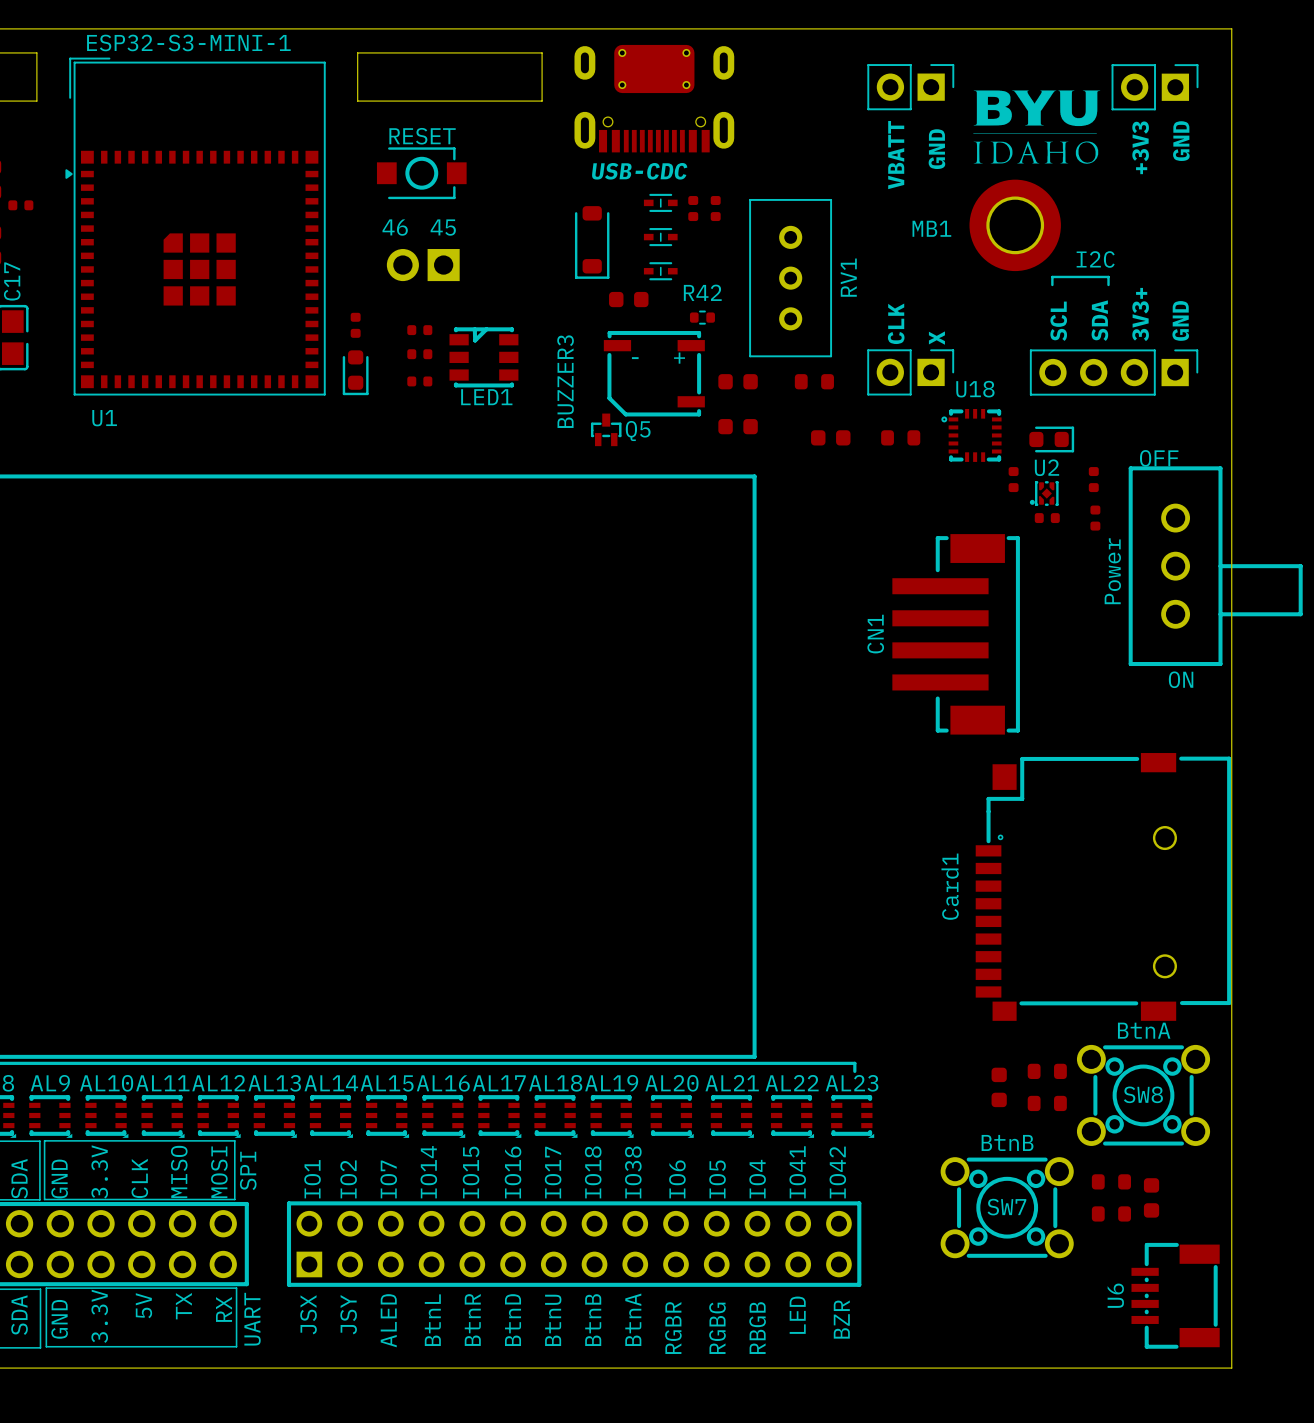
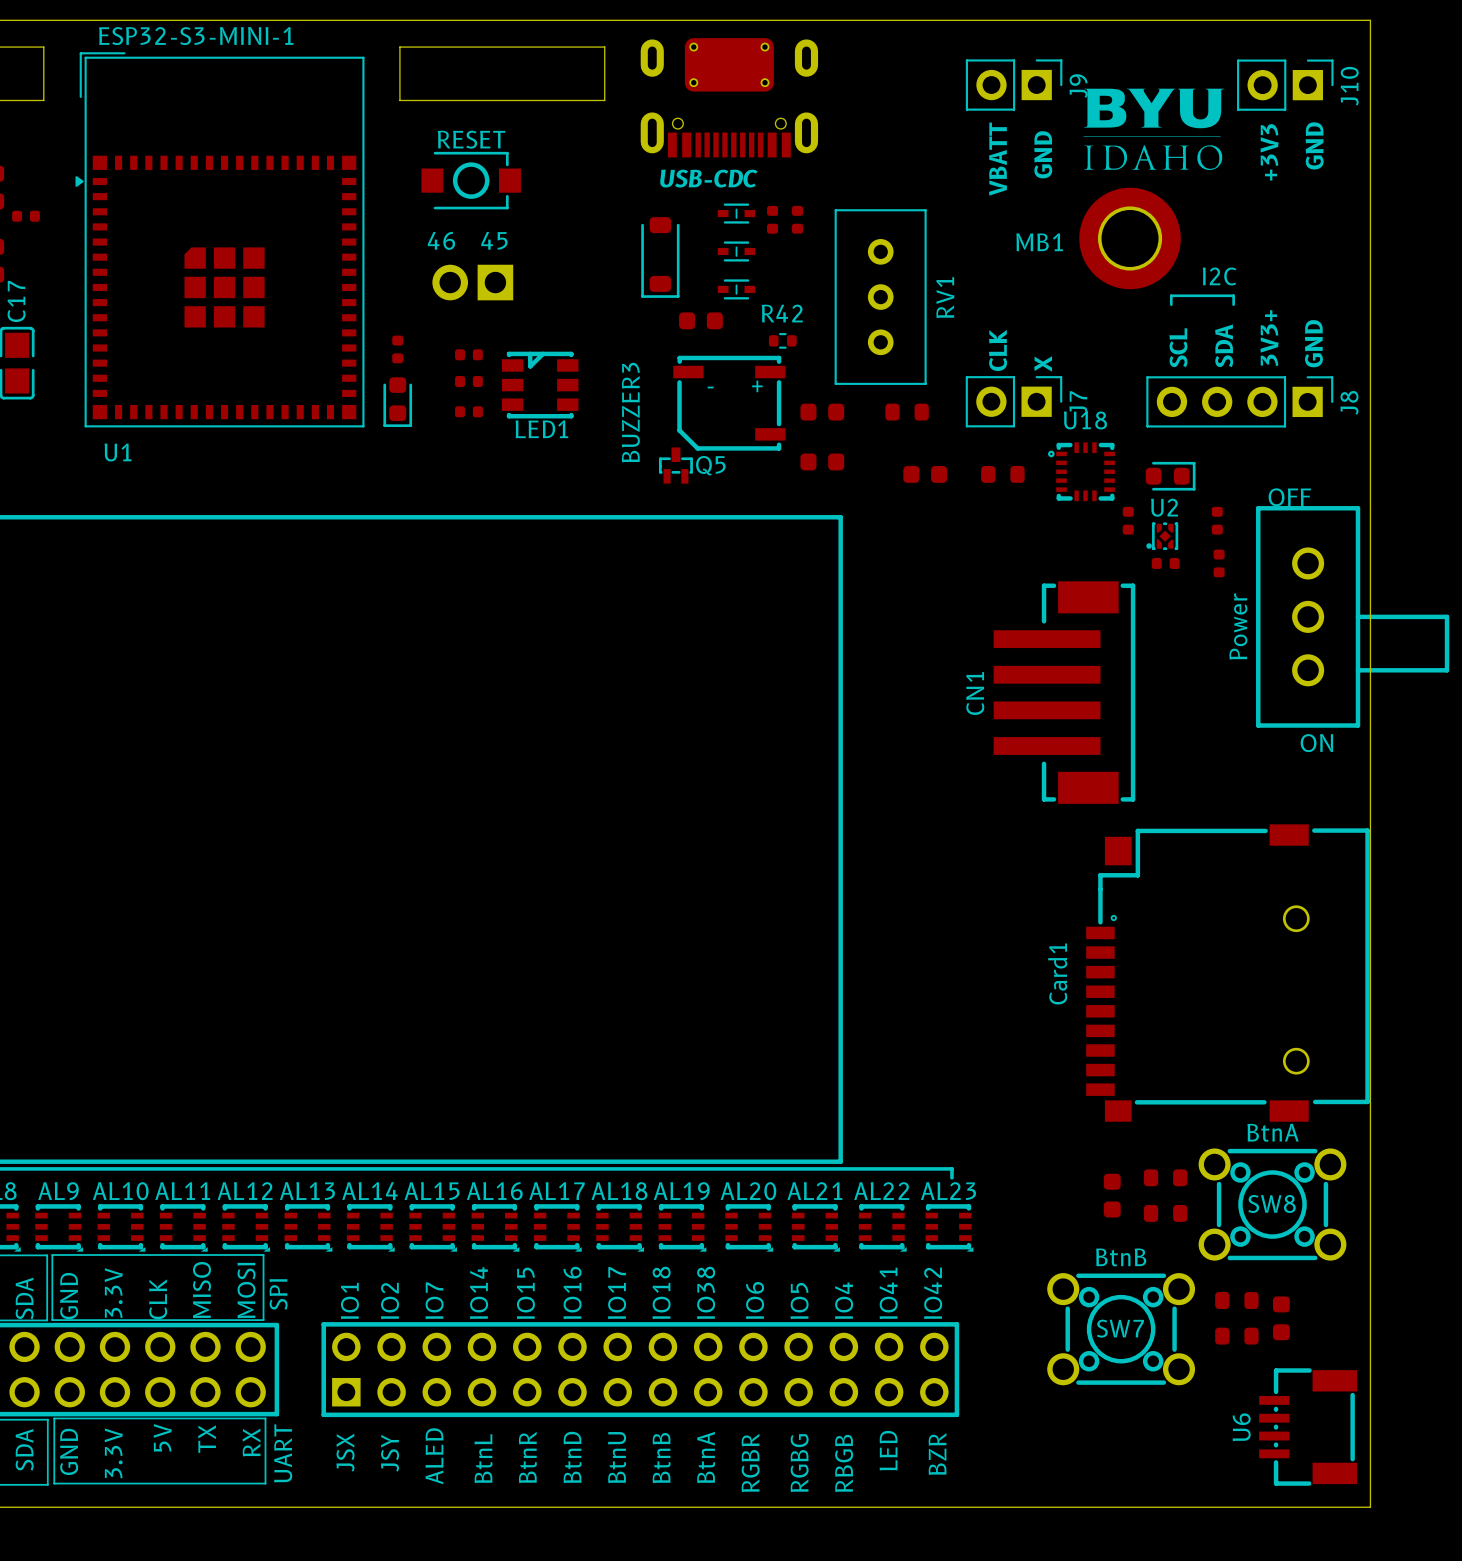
J9 name: none -> J9 (1078, 86)
J10 name: none -> J10 (1349, 86)
J7 name: none -> J7 (1078, 402)
J8 name: none -> J8 (1349, 402)

